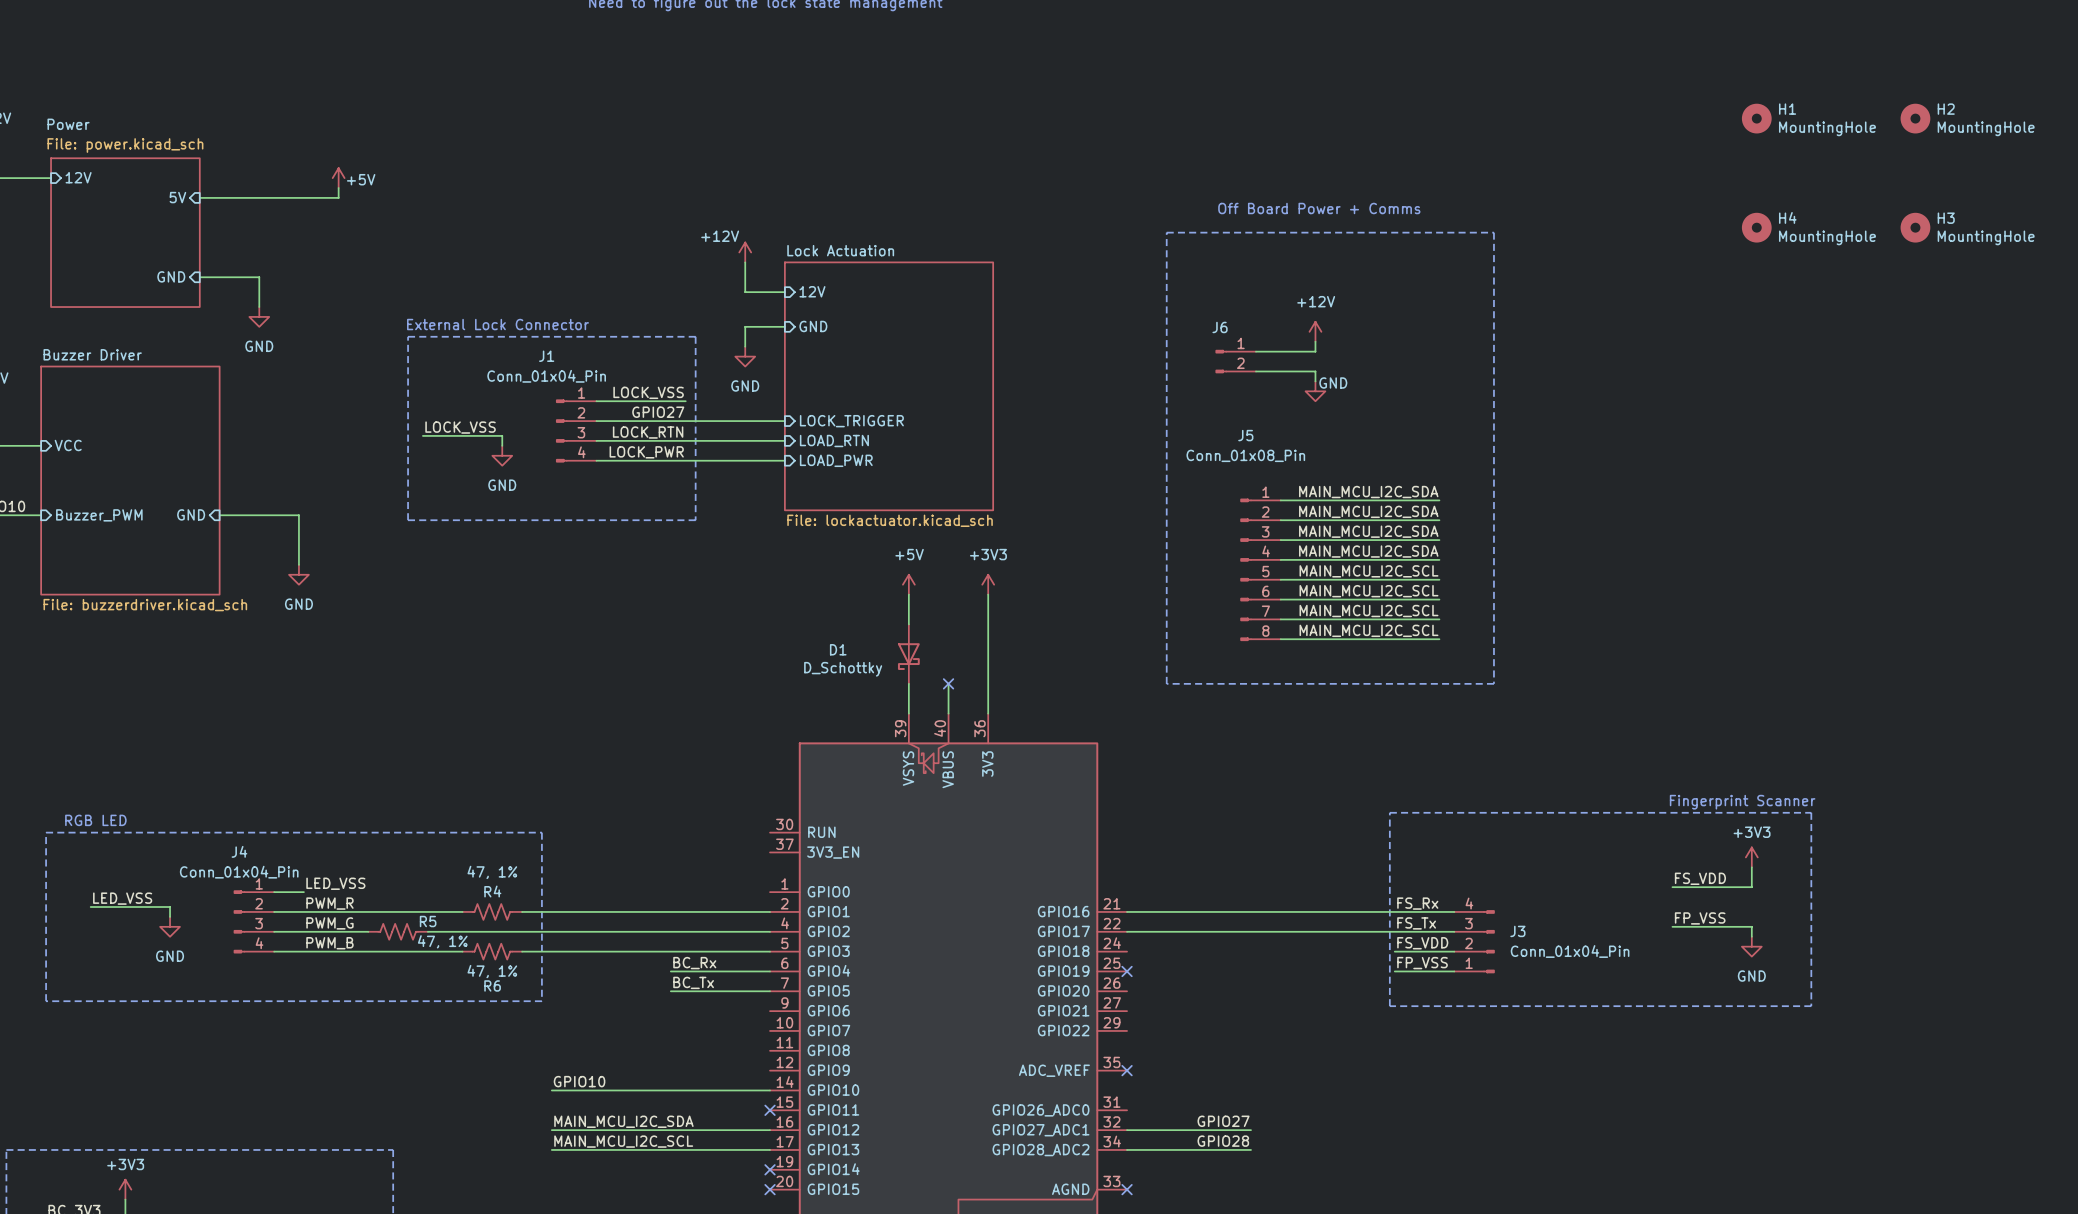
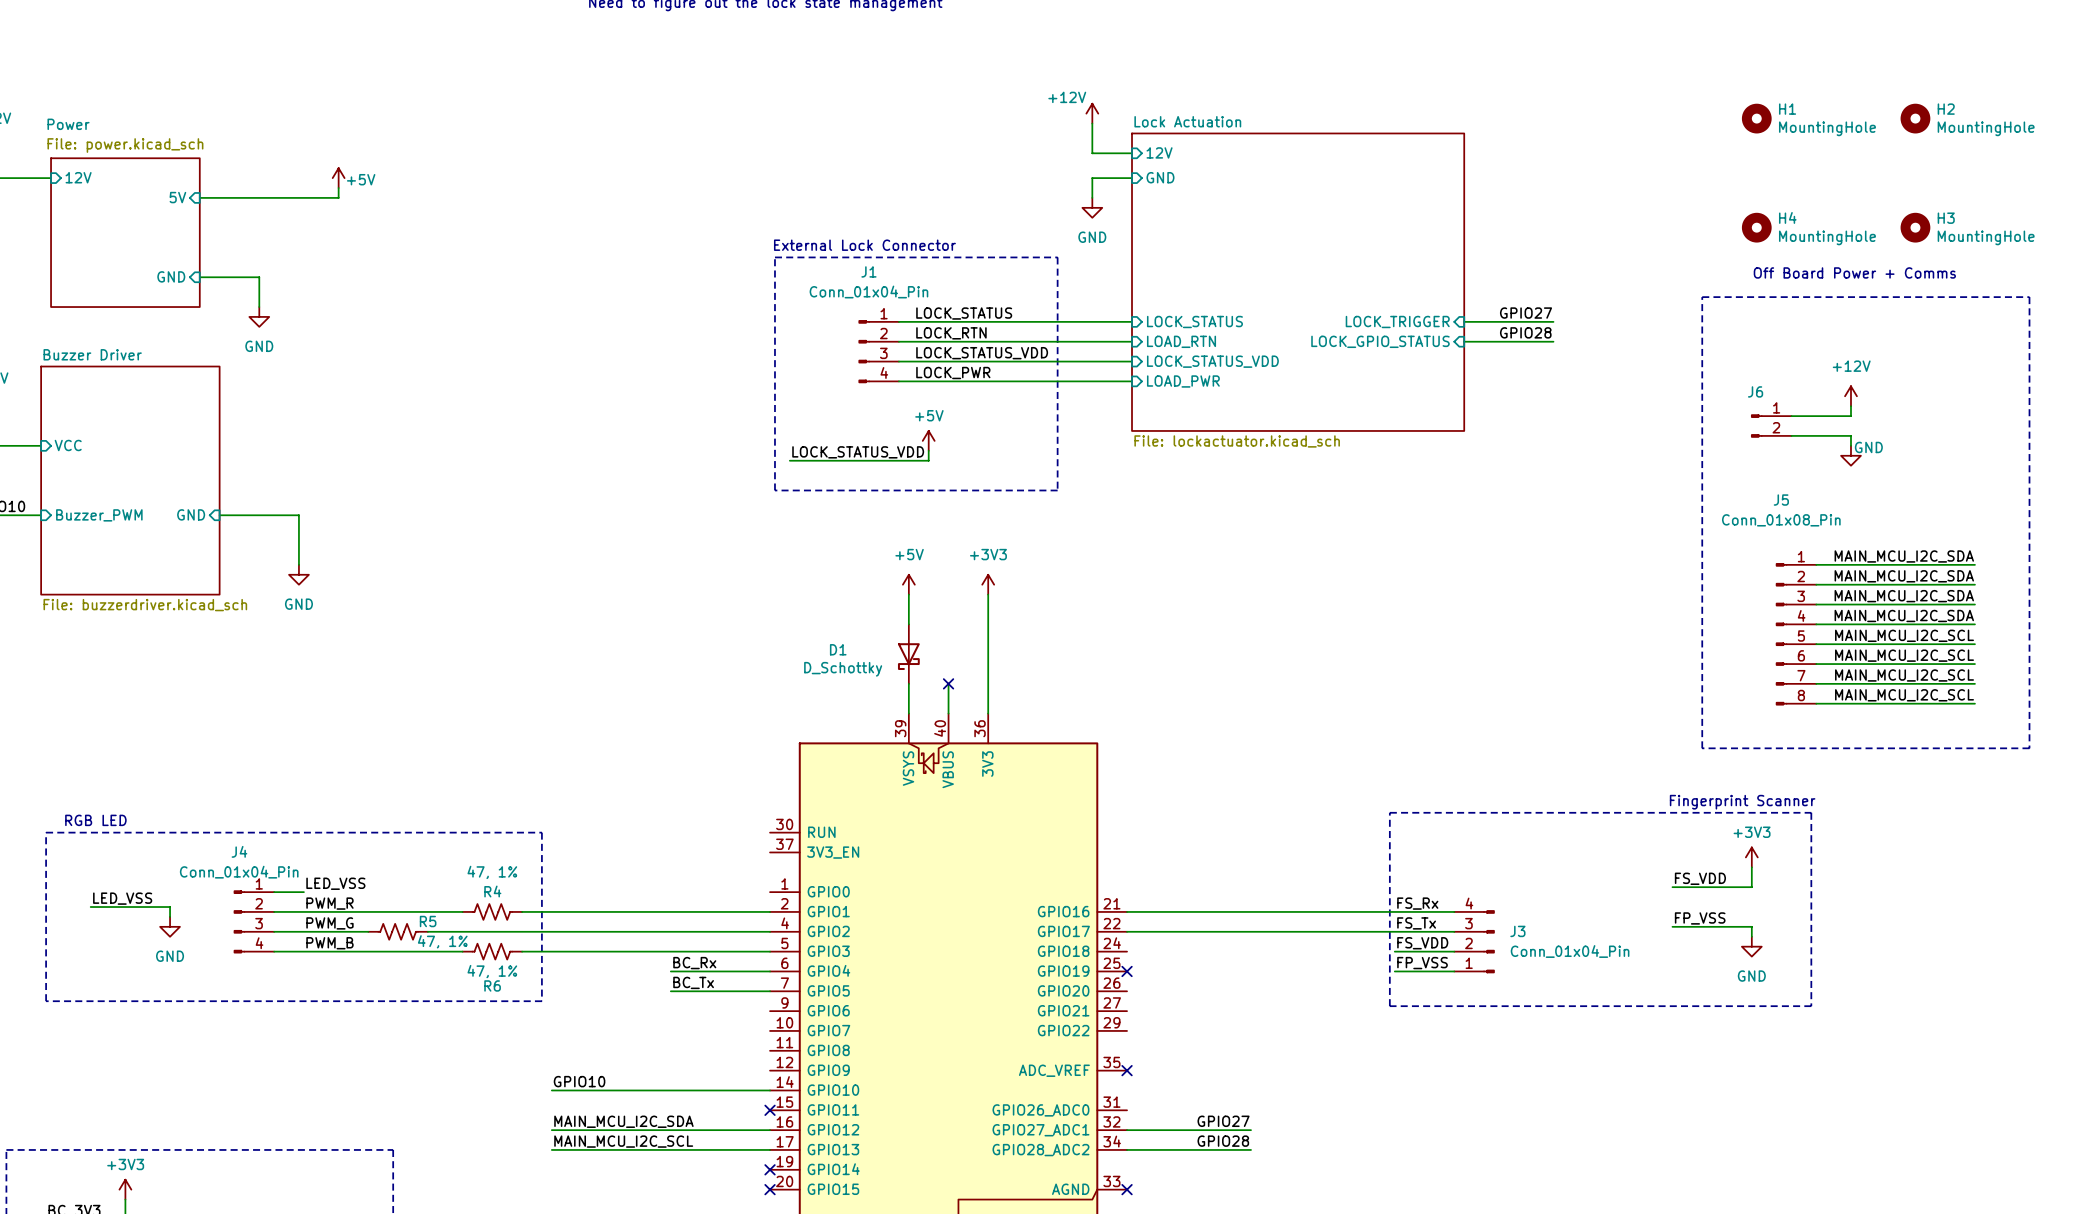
power symbol: none -> +12V (1092, 113)
wire: none -> (1092, 123) (1092, 153) (1132, 153)
sheet pin: none -> 12V (1159, 152)
sheet pin: none -> GND (1160, 177)
wire: none -> (1132, 178) (1092, 178) (1092, 197)
power symbol: none -> GND (1092, 207)
text: Off Board Power + Comms (1319, 208) -> none
line: (1166, 232) (1493, 232) (1493, 683) (1166, 683) (1166, 232) -> none
text: none -> External Lock Connector (864, 245)
power symbol: +12V (745, 252) -> none
line: none -> (774, 257) (1057, 257) (1057, 490) (774, 490) (774, 257)
wire: (745, 262) (745, 292) (784, 292) -> none
text: none -> Off Board Power + Comms (1854, 272)
sheet Lock Actuation: none -> File: lockactuator.kicad_sch (1298, 282)
sheet pin: 12V (812, 291) -> none
line: none -> (1702, 297) (2029, 297) (2029, 748) (1702, 748) (1702, 297)
label: none -> LOCK_STATUS (964, 313)
label: none -> GPIO27 (1526, 313)
wire: none -> (898, 321) (1132, 321)
sheet pin: none -> LOCK_STATUS (1194, 321)
sheet pin: none -> LOCK_TRIGGER (1397, 321)
wire: none -> (1464, 321) (1553, 321)
text: External Lock Connector (498, 324) -> none
wire: (784, 326) (745, 326) (745, 346) -> none
sheet pin: GND (813, 326) -> none
power symbol: +12V (1315, 331) -> none
label: none -> GPIO28 (1525, 332)
label: none -> LOCK_RTN (951, 333)
line: (408, 336) (695, 336) (695, 520) (408, 520) (408, 336) -> none
wire: none -> (898, 341) (1132, 341)
sheet pin: none -> LOAD_RTN (1181, 341)
wire: (1315, 341) (1315, 351) (1255, 351) -> none
sheet pin: none -> LOCK_GPIO_STATUS (1380, 341)
wire: none -> (1464, 341) (1553, 341)
label: none -> LOCK_STATUS_VDD (982, 353)
J1 name position: J1 (546, 356) -> J1 (868, 271)
power symbol: GND (745, 356) -> none
wire: none -> (898, 361) (1132, 361)
sheet pin: none -> LOCK_STATUS_VDD (1212, 361)
J6 position: (1235, 361) -> (1771, 426)
wire: (1255, 371) (1315, 371) (1315, 381) -> none
label: none -> LOCK_PWR (953, 373)
J1 value position: Conn_01x04_Pin (546, 376) -> Conn_01x04_Pin (868, 292)
wire: none -> (898, 381) (1132, 381)
sheet pin: none -> LOAD_PWR (1183, 381)
sheet Lock Actuation: File: lockactuator.kicad_sch (889, 386) -> none
power symbol: GND (1315, 391) -> none
label: LOCK_VSS (648, 392) -> none
power symbol: none -> +12V (1850, 396)
wire: (596, 401) (685, 401) -> none
wire: none -> (1850, 406) (1850, 416) (1791, 416)
label: GPIO27 (658, 412) -> none
wire: (596, 421) (784, 421) -> none
sheet pin: LOCK_TRIGGER (851, 421) -> none
label: LOCK_VSS (460, 427) -> none
J1 position: (576, 430) -> (878, 351)
label: LOCK_RTN (648, 432) -> none
wire: (422, 435) (502, 435) (502, 445) -> none
wire: none -> (1791, 435) (1850, 435) (1850, 445)
wire: (596, 440) (784, 440) -> none
power symbol: none -> +5V (928, 440)
sheet pin: LOAD_RTN (834, 441) -> none
wire: none -> (928, 450) (928, 460) (789, 460)
label: LOCK_PWR (646, 452) -> none
label: none -> LOCK_STATUS_VDD (858, 452)
power symbol: GND (502, 455) -> none
power symbol: none -> GND (1850, 455)
wire: (596, 460) (784, 460) -> none
sheet pin: LOAD_PWR (836, 460) -> none
label: MAIN_MCU_I2C_SDA (1368, 492) -> none
wire: (1280, 500) (1439, 500) -> none
label: MAIN_MCU_I2C_SDA (1368, 511) -> none
wire: (1280, 520) (1439, 520) -> none
label: MAIN_MCU_I2C_SDA (1368, 531) -> none
wire: (1280, 540) (1439, 540) -> none
label: MAIN_MCU_I2C_SDA (1368, 551) -> none
label: none -> MAIN_MCU_I2C_SDA (1904, 556)
wire: (1280, 559) (1439, 559) -> none
wire: none -> (1816, 564) (1974, 564)
J5 position: (1260, 569) -> (1796, 634)
label: MAIN_MCU_I2C_SCL (1368, 571) -> none
label: none -> MAIN_MCU_I2C_SDA (1904, 576)
wire: (1280, 579) (1439, 579) -> none
wire: none -> (1816, 584) (1974, 584)
label: MAIN_MCU_I2C_SCL (1368, 591) -> none
label: none -> MAIN_MCU_I2C_SDA (1904, 596)
wire: (1280, 599) (1439, 599) -> none
wire: none -> (1816, 604) (1974, 604)
label: MAIN_MCU_I2C_SCL (1368, 611) -> none
label: none -> MAIN_MCU_I2C_SDA (1904, 615)
wire: (1280, 619) (1439, 619) -> none
wire: none -> (1816, 624) (1974, 624)
label: MAIN_MCU_I2C_SCL (1368, 630) -> none
label: none -> MAIN_MCU_I2C_SCL (1904, 635)
wire: (1280, 639) (1439, 639) -> none
wire: none -> (1816, 644) (1974, 644)
label: none -> MAIN_MCU_I2C_SCL (1904, 655)
wire: none -> (1816, 664) (1974, 664)
label: none -> MAIN_MCU_I2C_SCL (1904, 675)
wire: none -> (1816, 683) (1974, 683)
label: none -> MAIN_MCU_I2C_SCL (1904, 695)
wire: none -> (1816, 703) (1974, 703)

